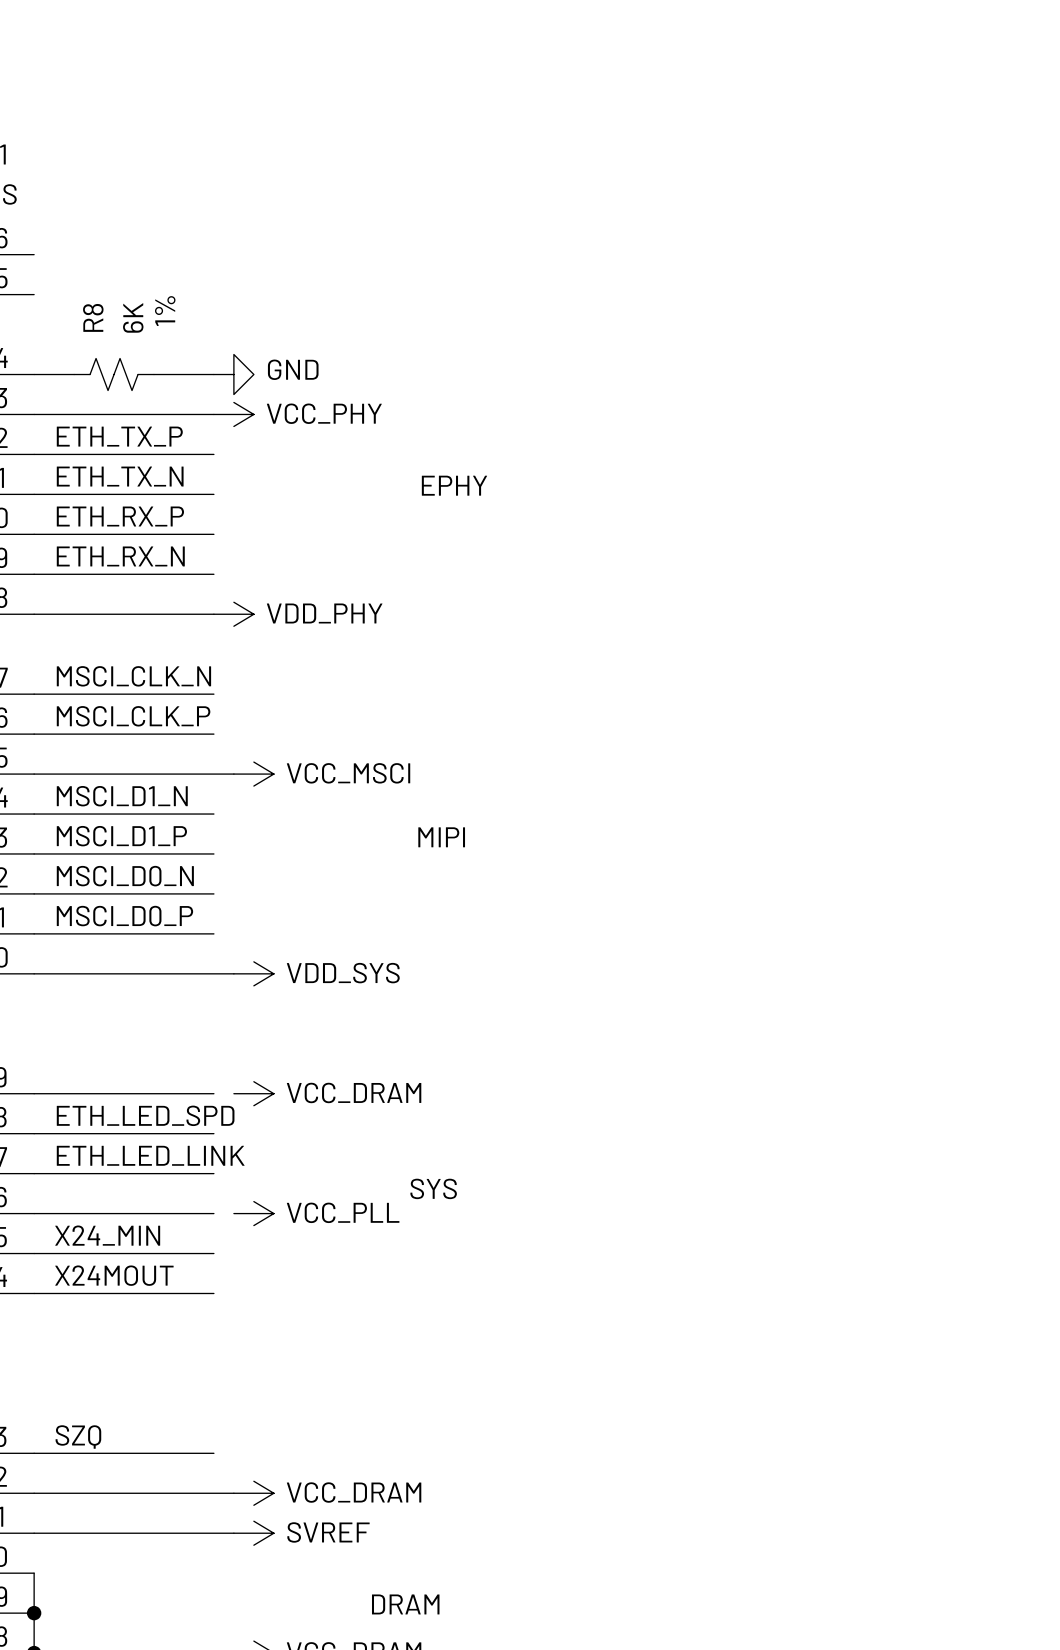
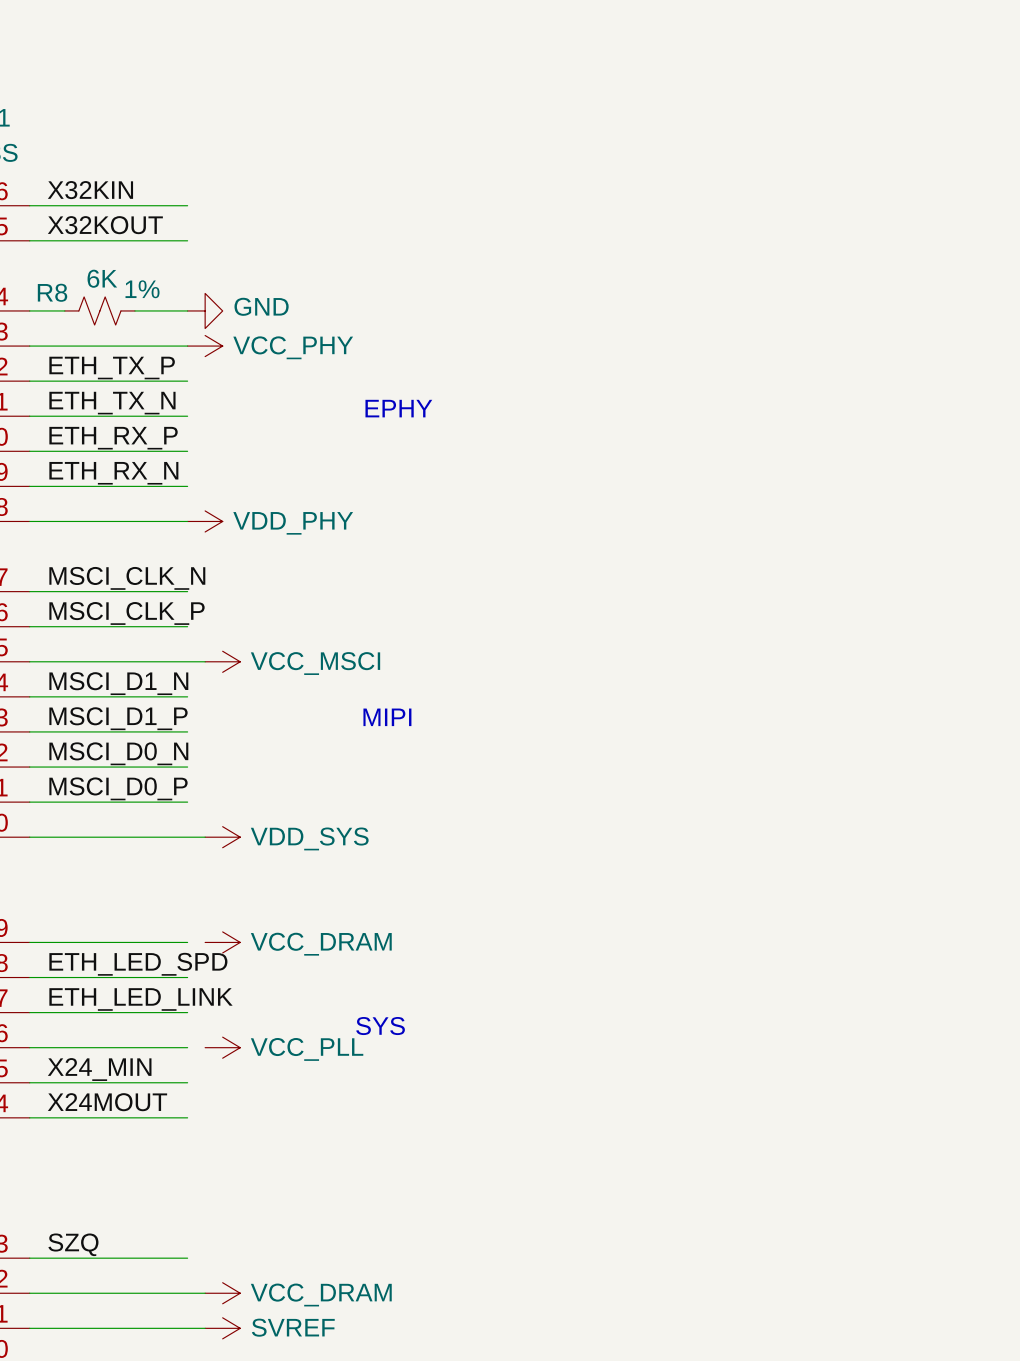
label: none -> X32KIN (90, 190)
wire: none -> (29, 205) (187, 205)
label: none -> X32KOUT (105, 225)
wire: none -> (29, 240) (187, 240)
R8 text rotation: 0° (165, 311) -> 90° clockwise (142, 289)
R8 name rotation: 0° (93, 317) -> 90° clockwise (52, 292)
R8 name position: R8 (93, 317) -> R8 (52, 292)
R8 value rotation: 0° (133, 317) -> 90° clockwise (102, 278)

